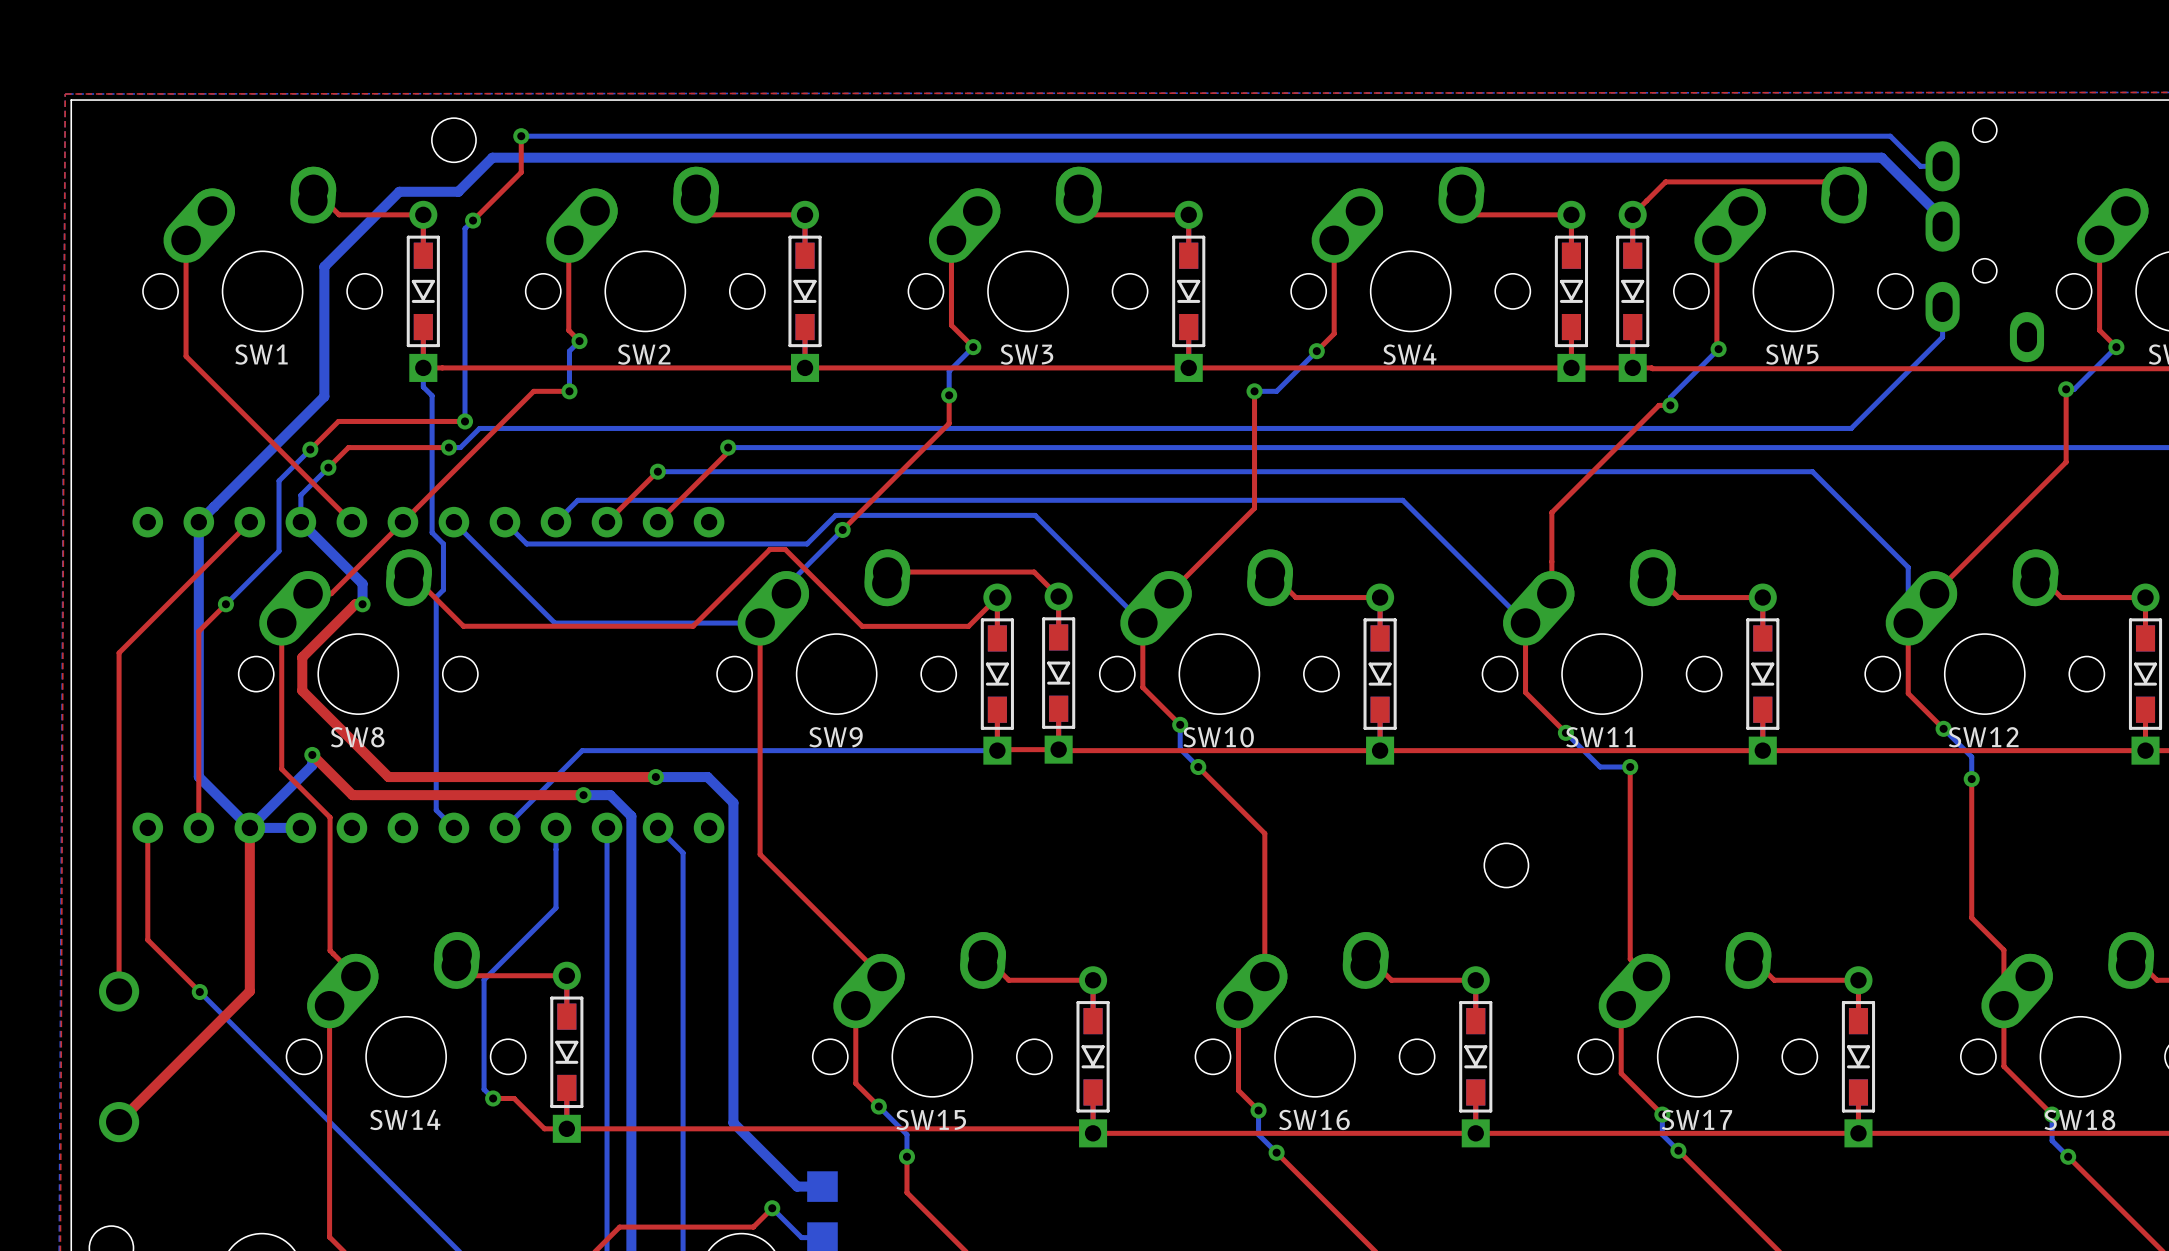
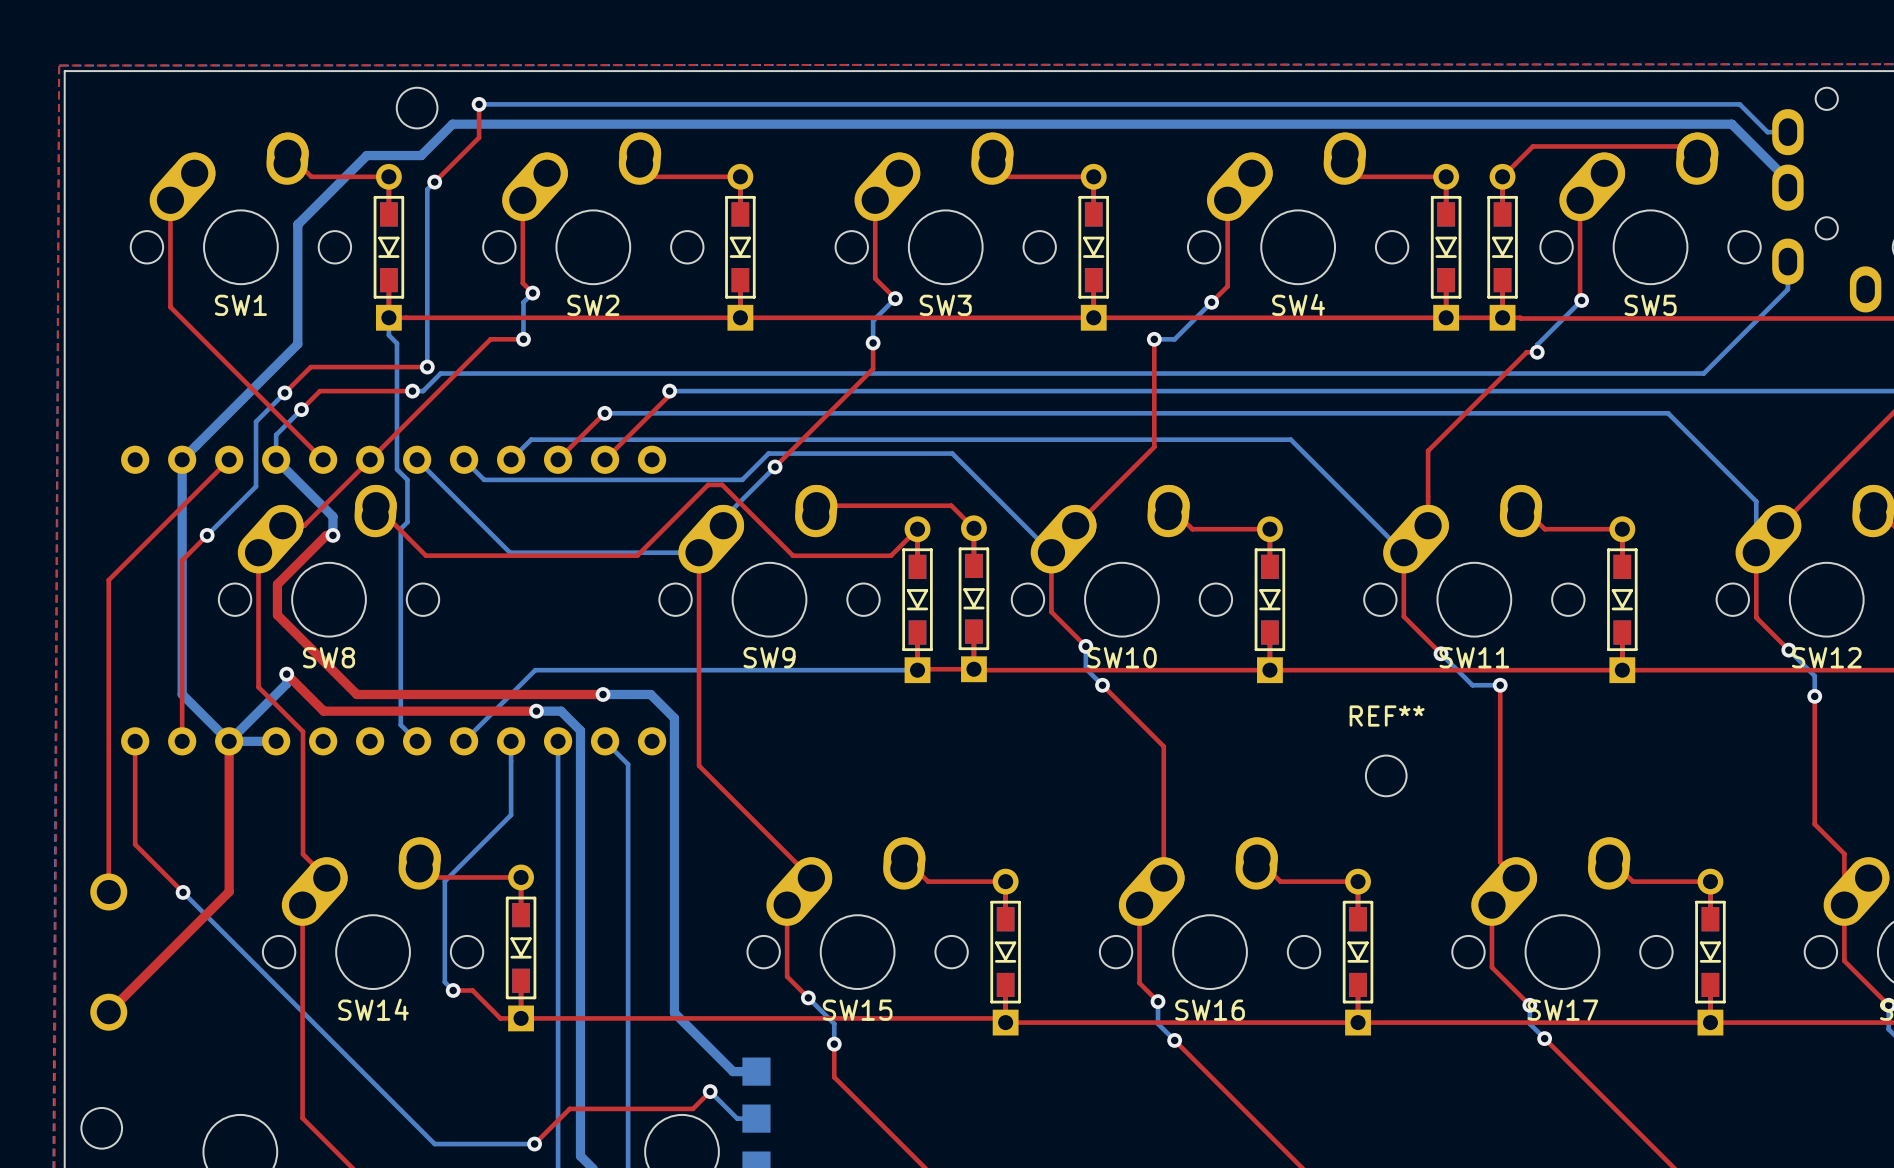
REF** name: none -> REF** (1387, 716)

